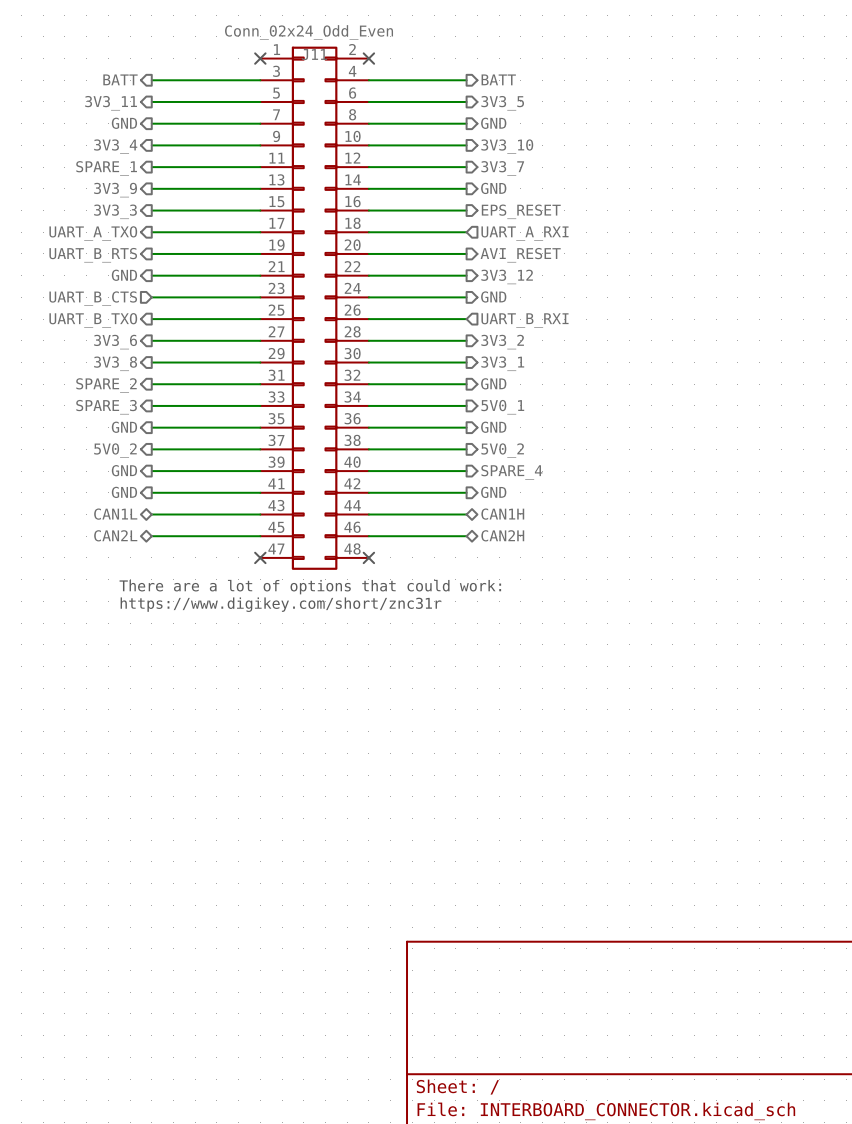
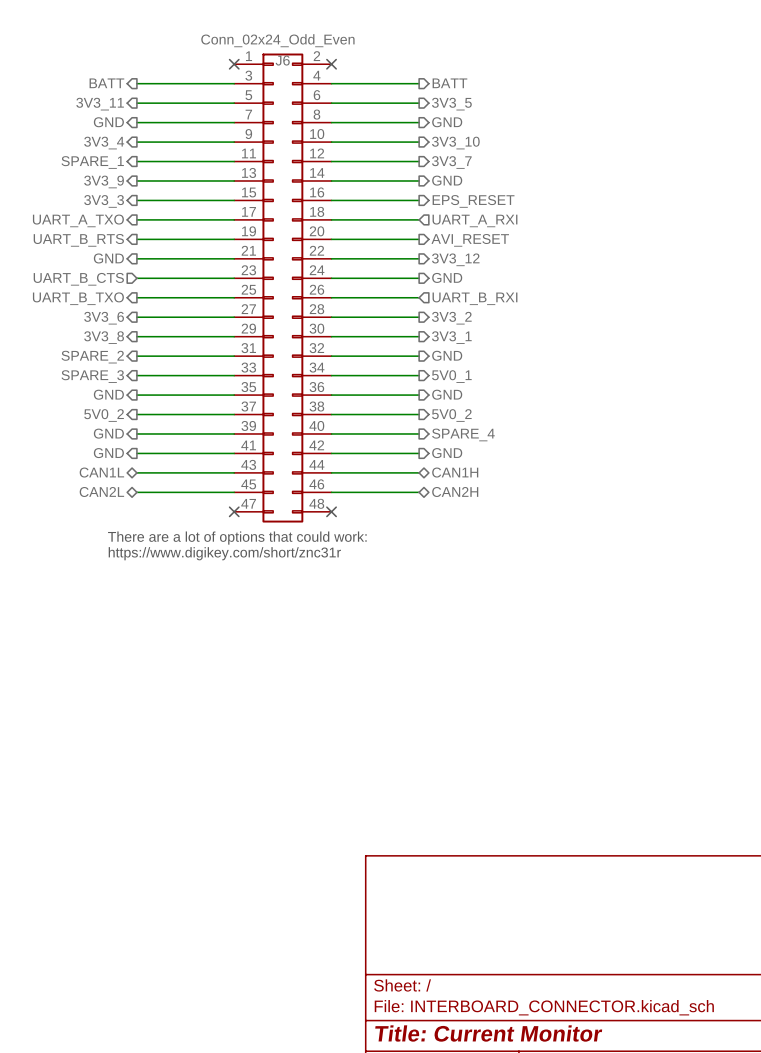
J11 name: J11 (314, 54) -> J6 (282, 60)

